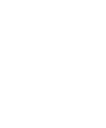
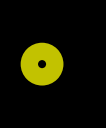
part: none -> (42, 64)

